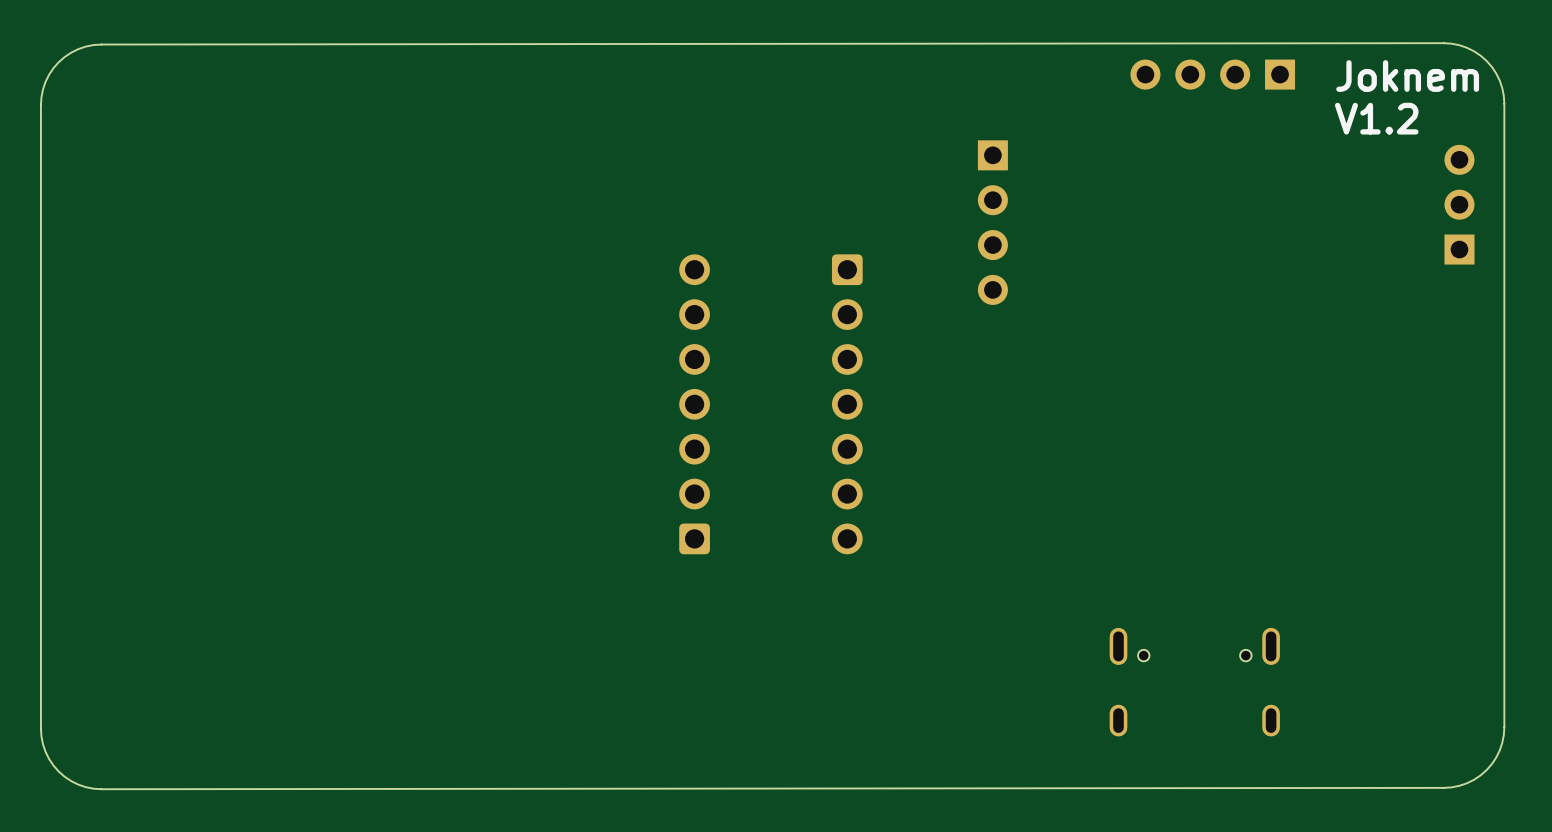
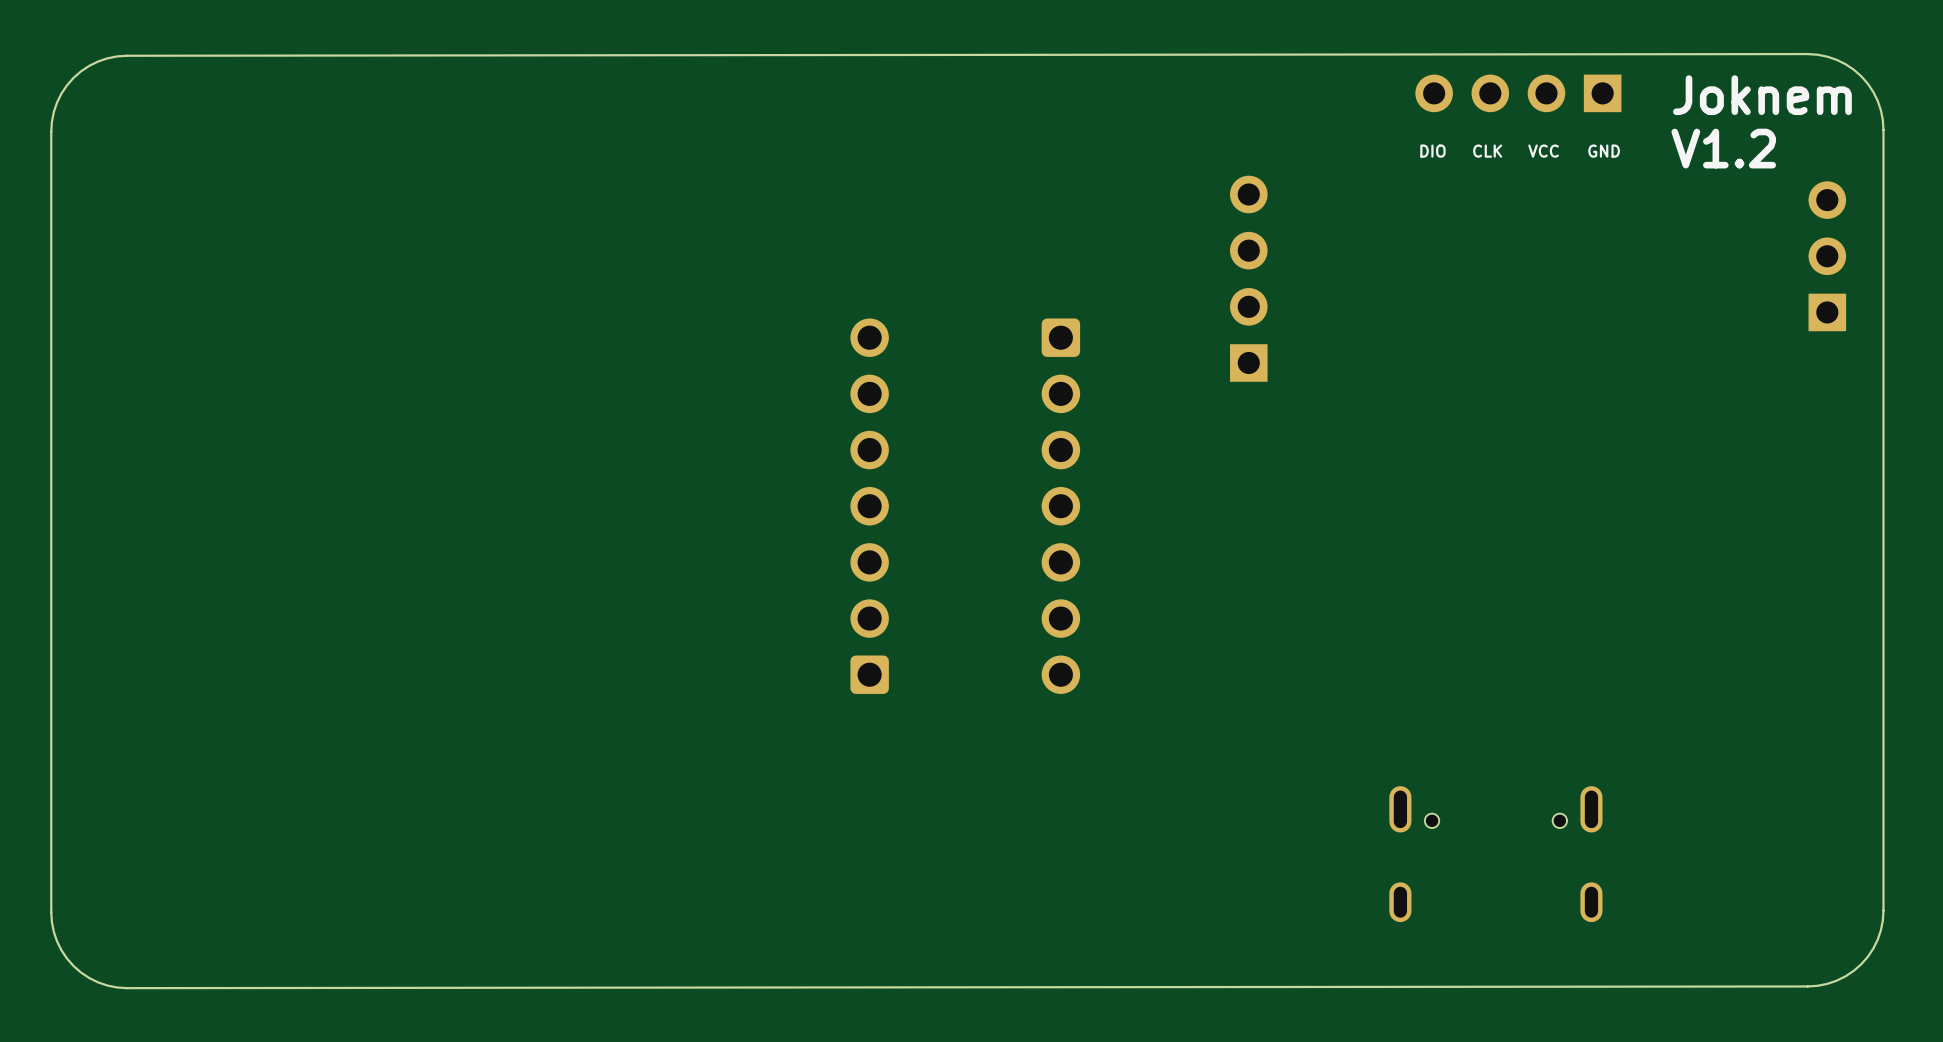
text: none -> DIO (1432, 151)
text: none -> CLK (1487, 151)
text: none -> VCC (1543, 151)
text: none -> GND (1604, 151)
part rotation: 0° (992, 222) -> 180° (1248, 278)

